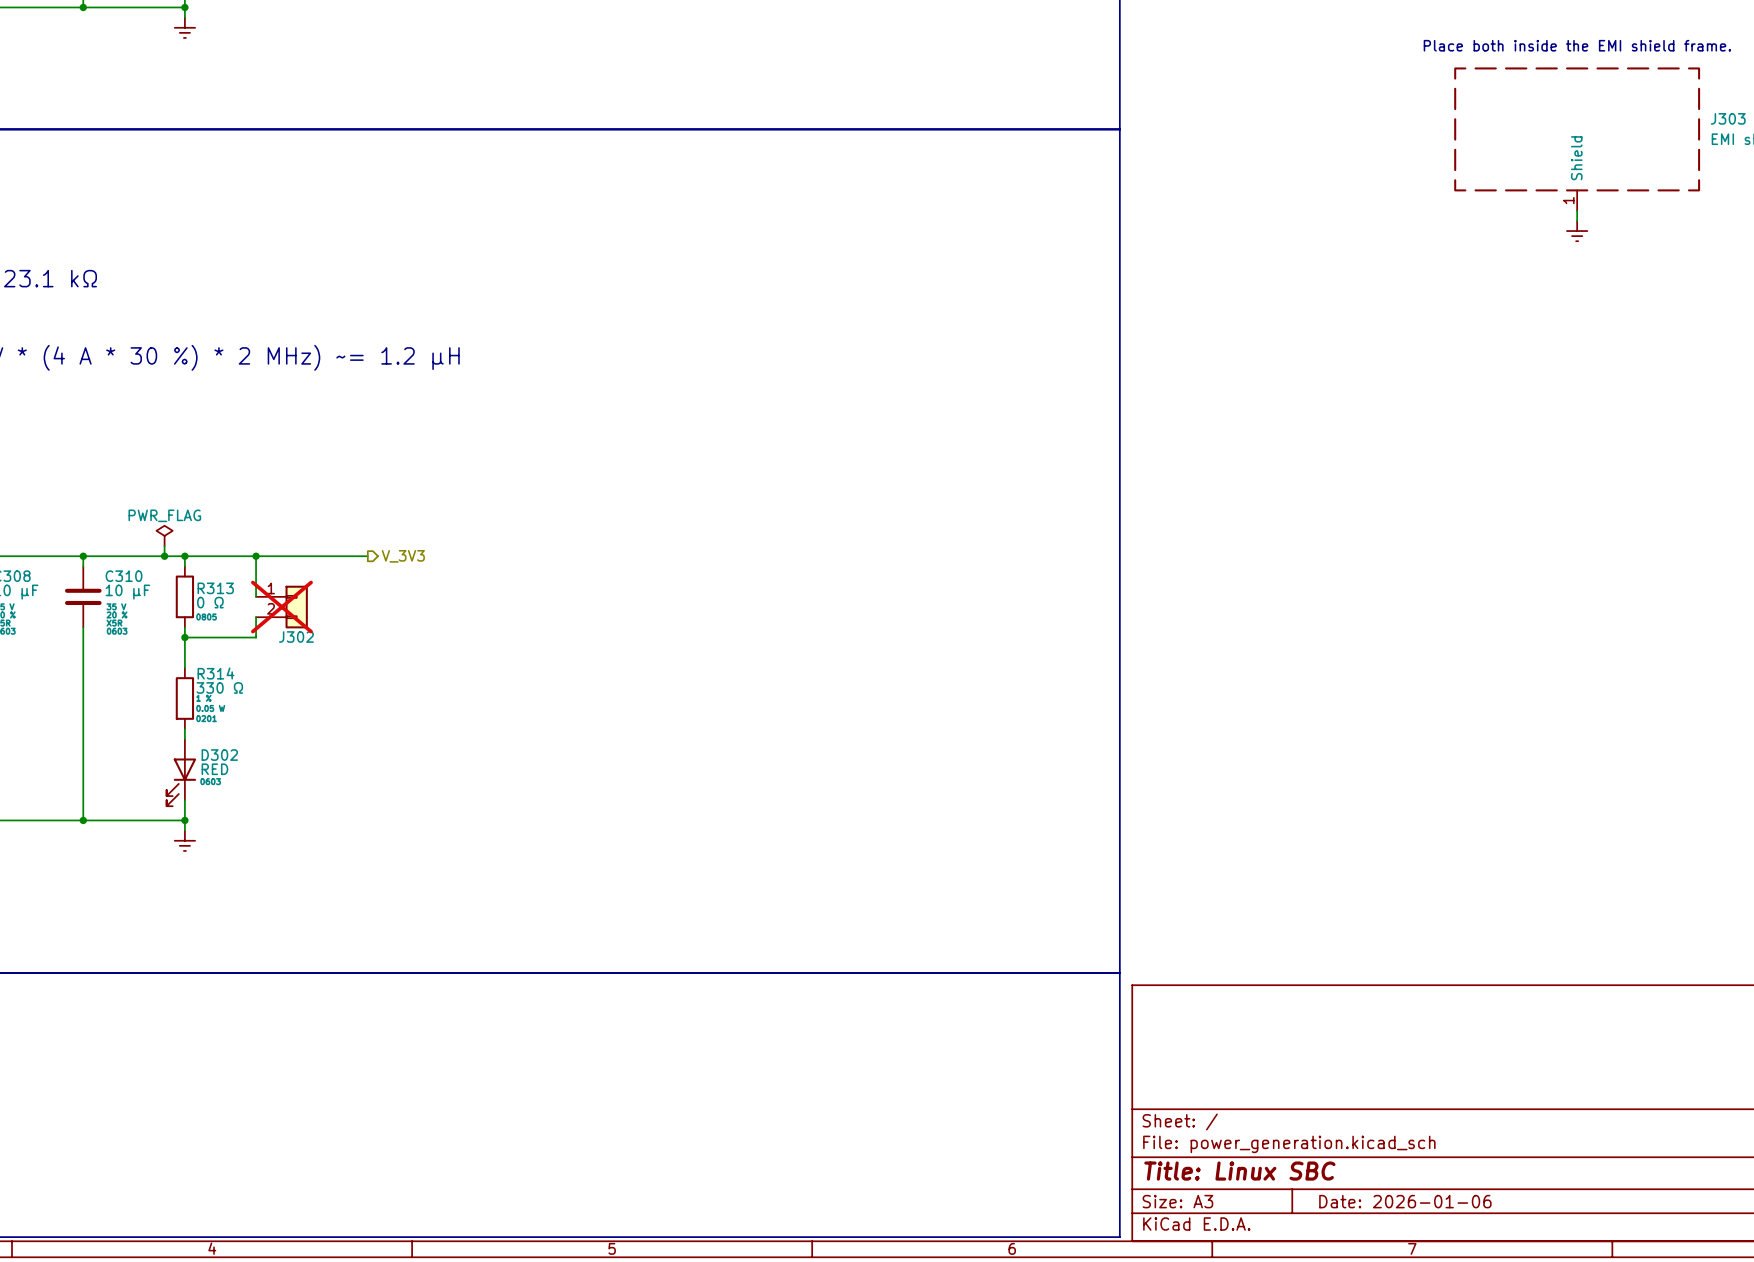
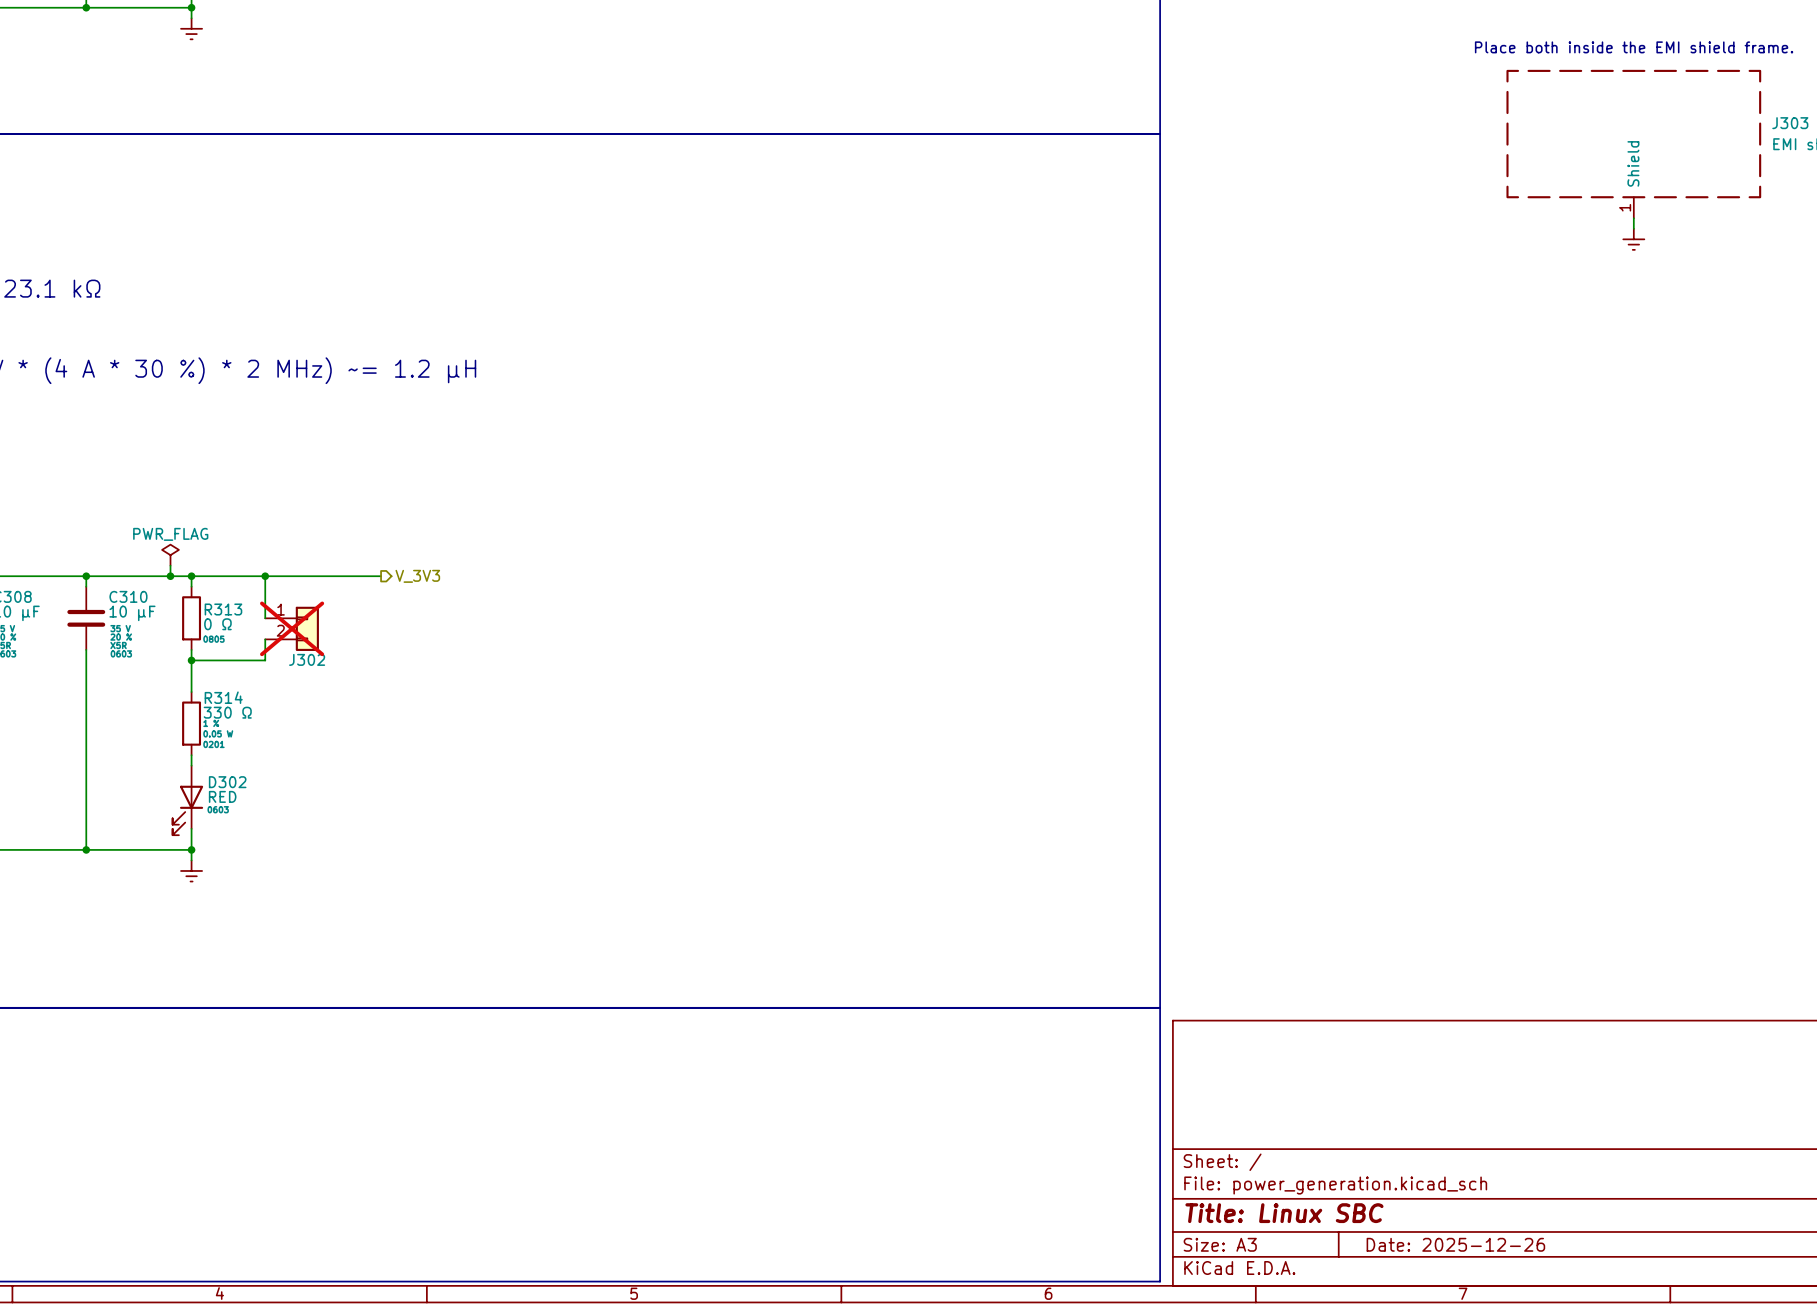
title block: Date: 2026-01-06 (1405, 1201) -> Date: 2025-12-26 (1455, 1244)

